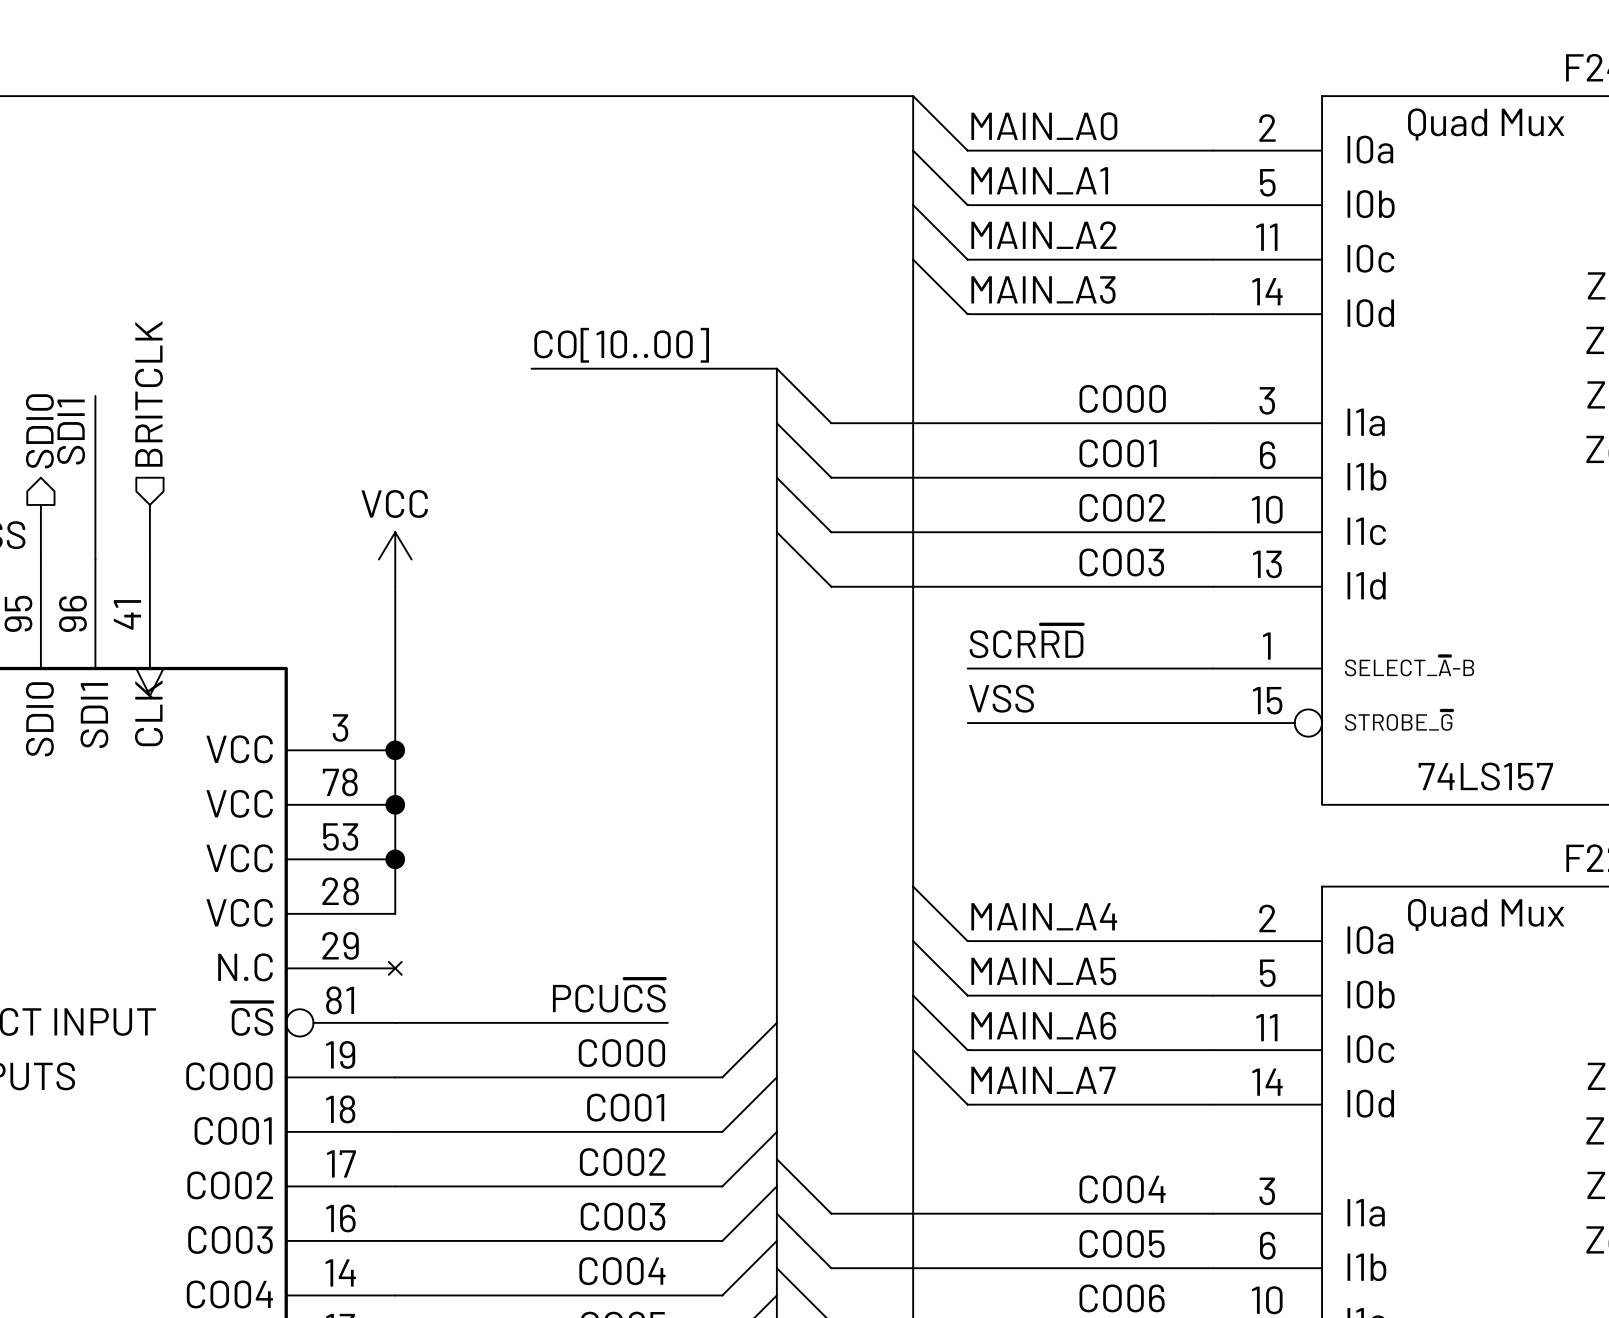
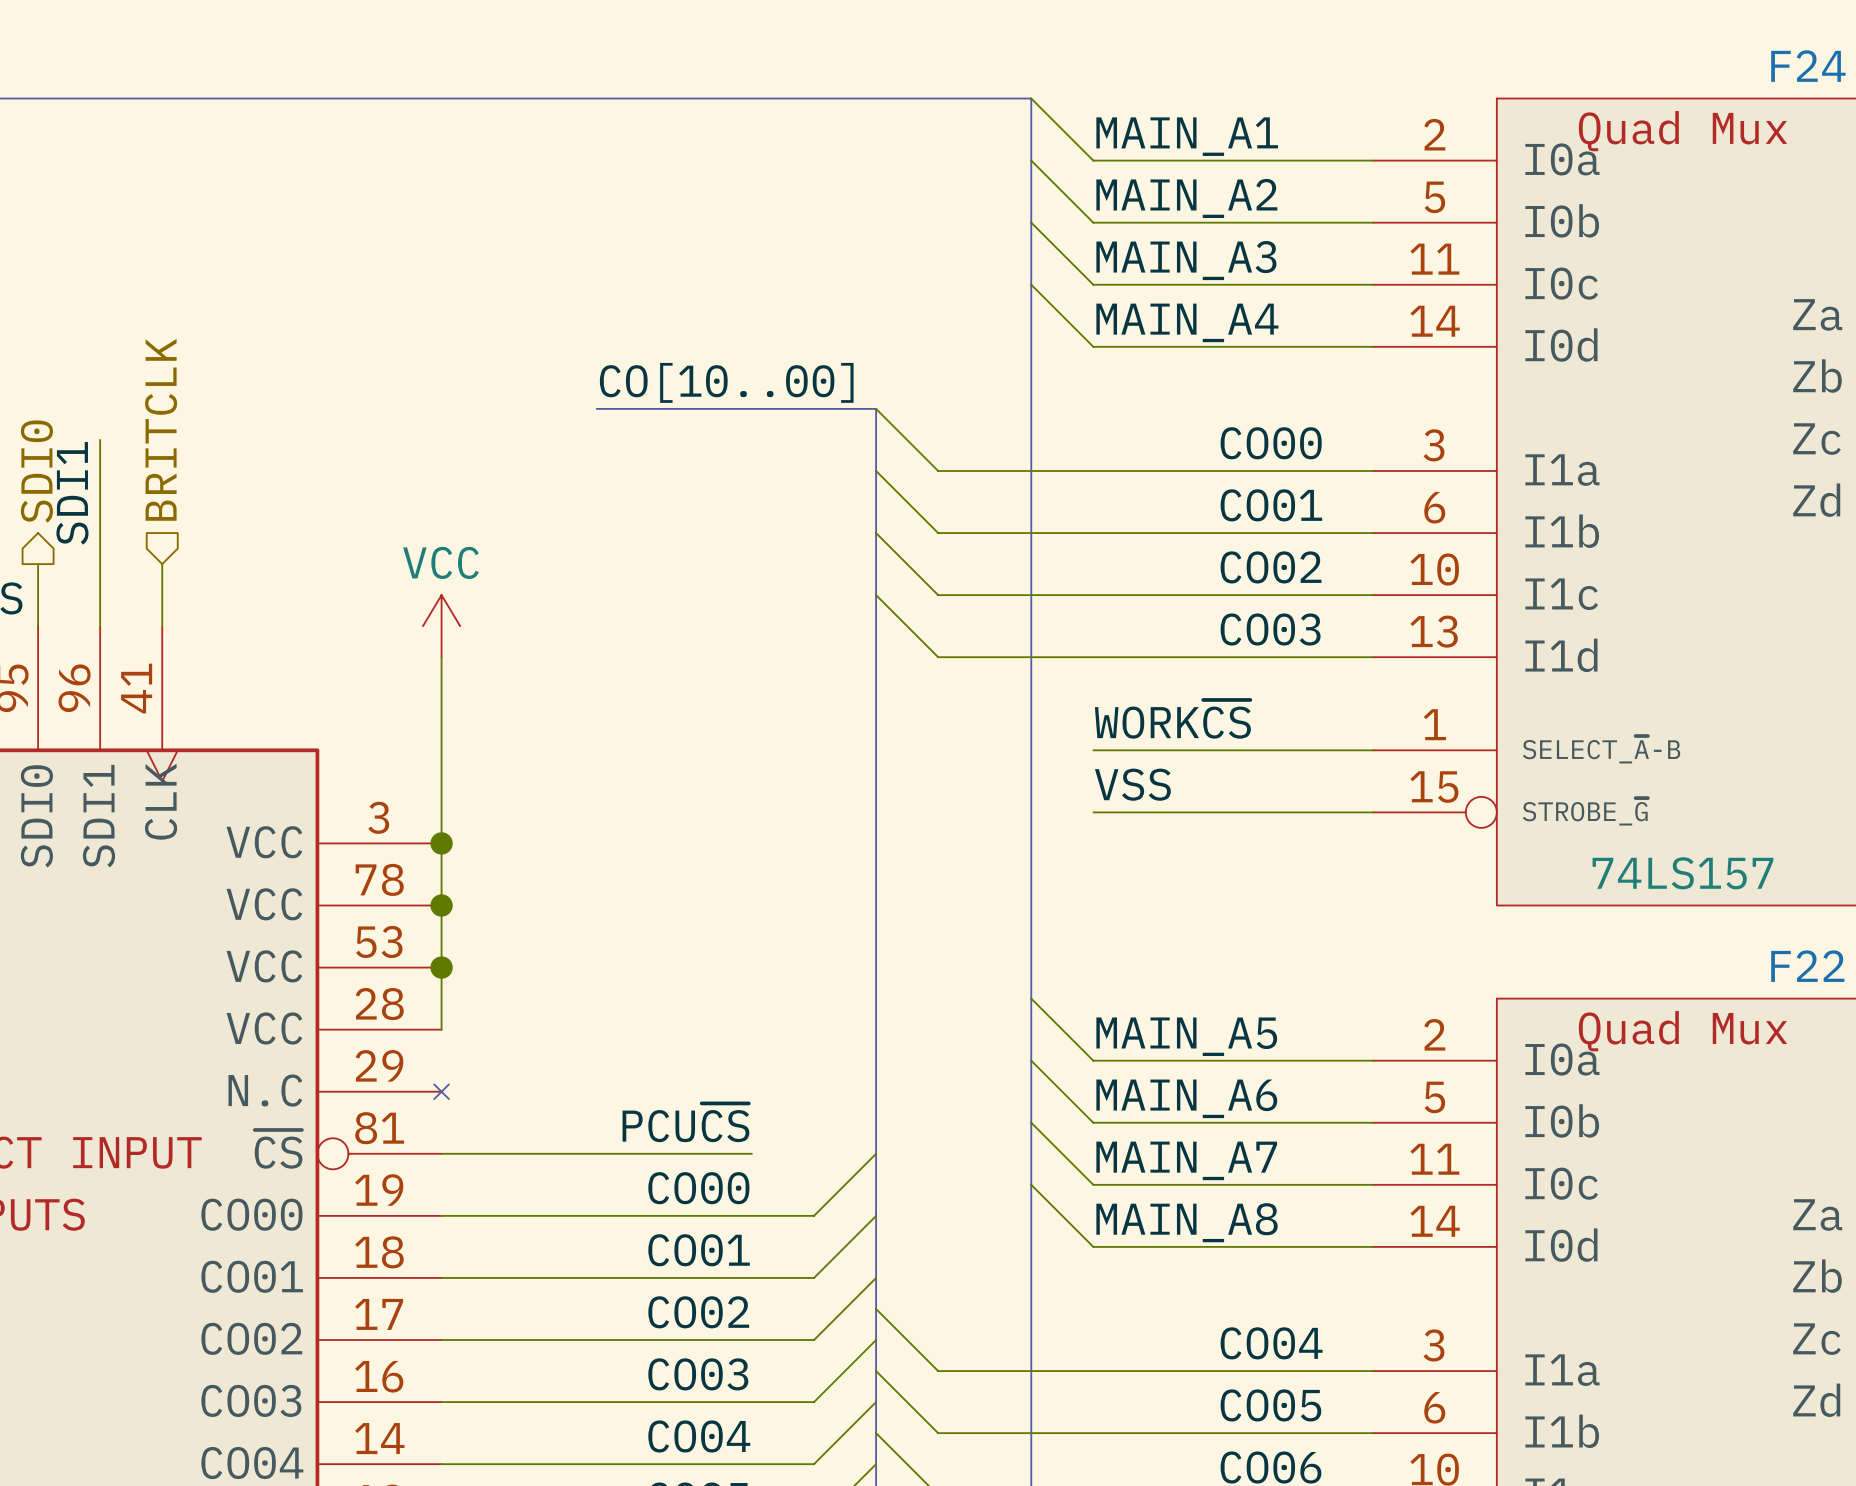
label: MAIN_A0 (1044, 126) -> MAIN_A1 (1187, 136)
label: MAIN_A1 (1039, 180) -> MAIN_A2 (1186, 198)
label: MAIN_A2 (1044, 235) -> MAIN_A3 (1186, 260)
label: MAIN_A3 (1043, 290) -> MAIN_A4 (1187, 322)
label: SCR~{RD} (1026, 641) -> WORK~{CS} (1172, 719)
label: MAIN_A4 (1044, 916) -> MAIN_A5 (1186, 1036)
label: MAIN_A5 (1043, 971) -> MAIN_A6 (1186, 1098)
label: MAIN_A6 (1043, 1025) -> MAIN_A7 (1186, 1160)
label: MAIN_A7 (1043, 1080) -> MAIN_A8 (1187, 1222)

